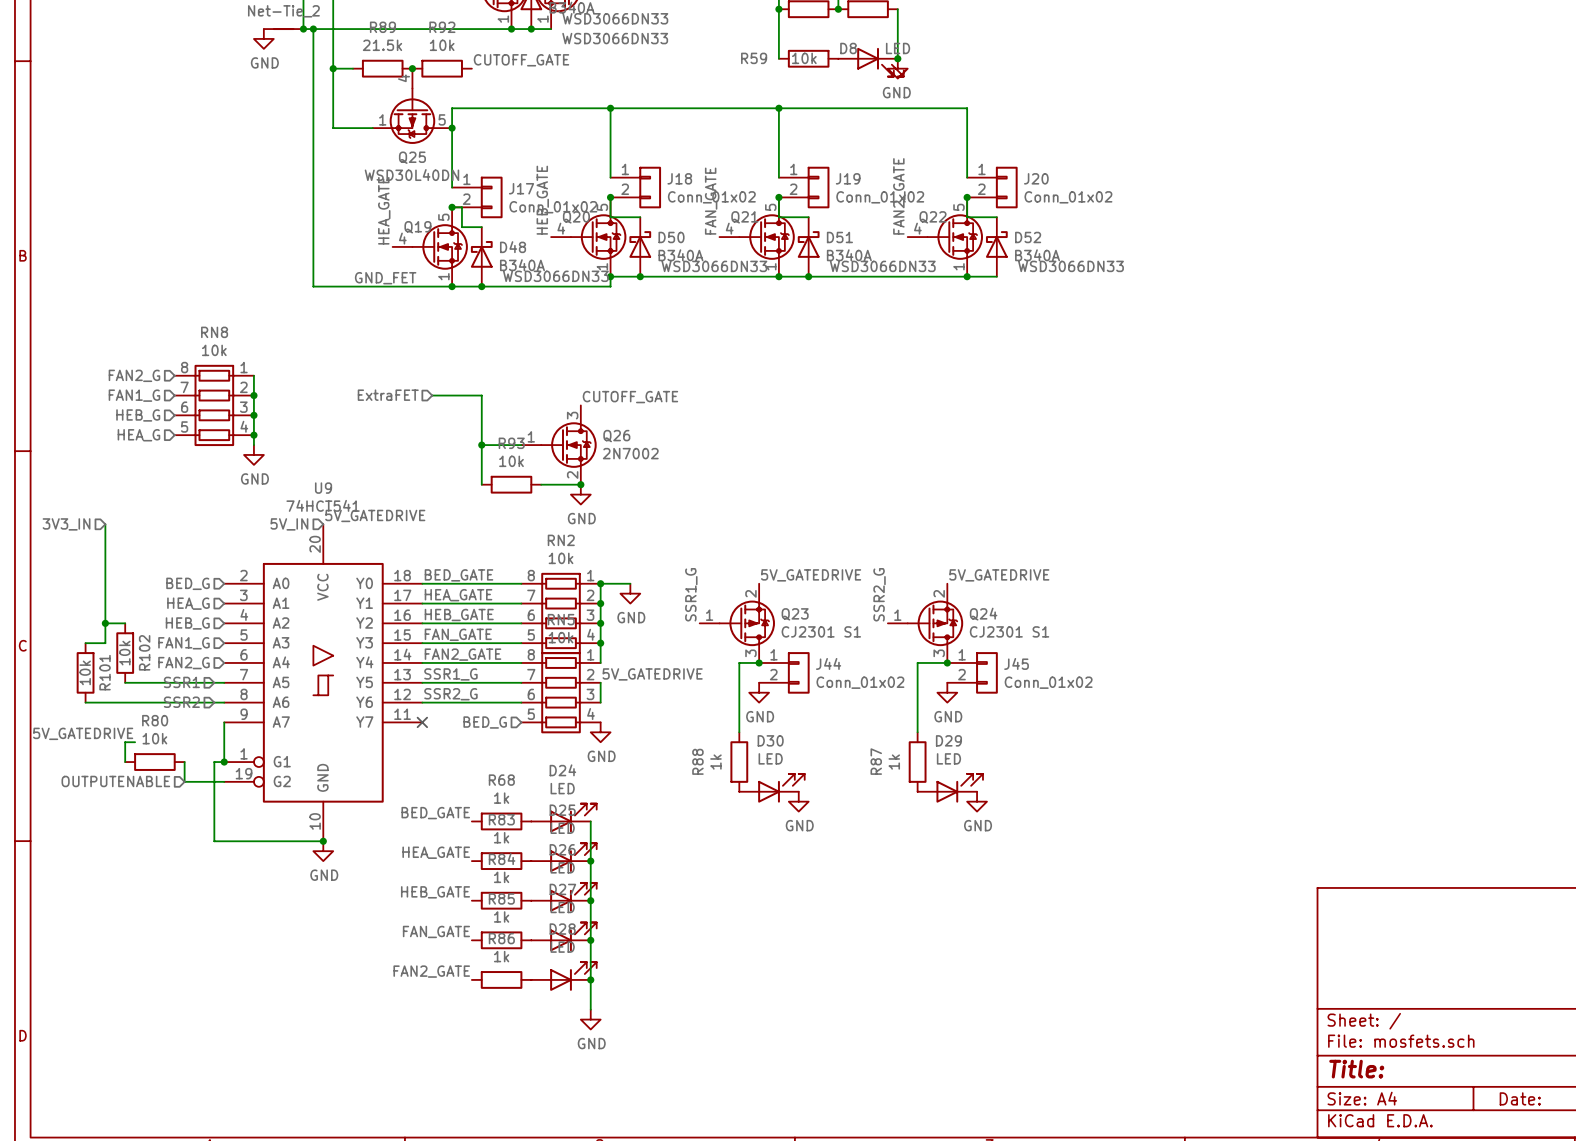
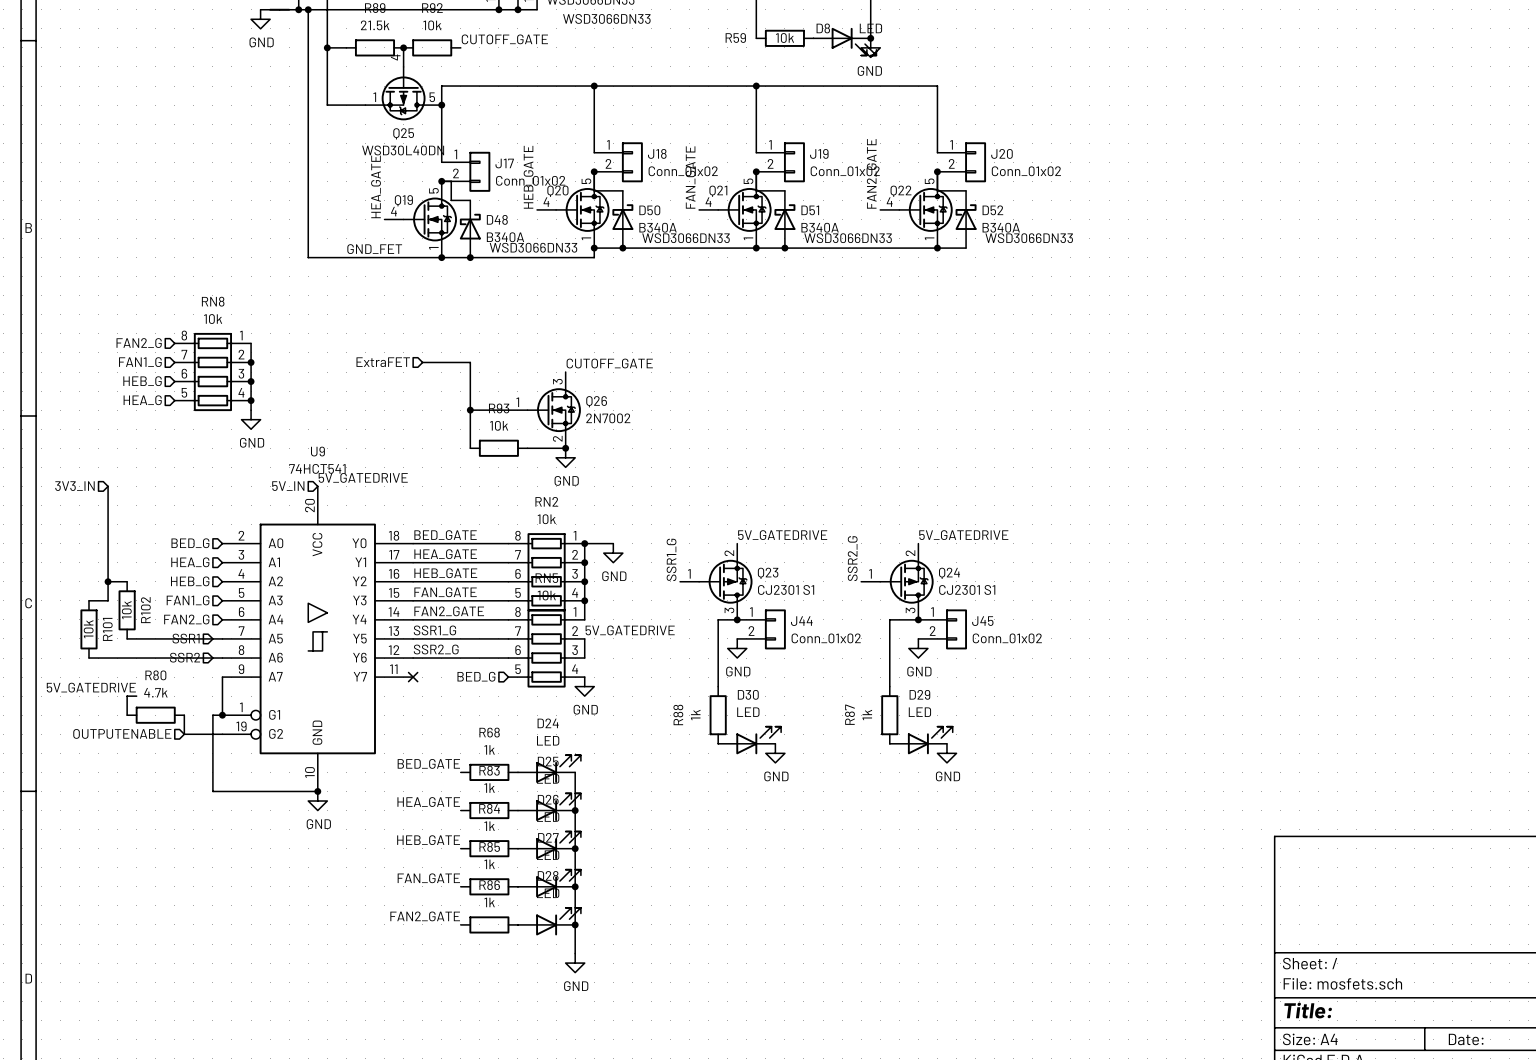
R80 value: 10k (154, 738) -> 4.7k (155, 692)

